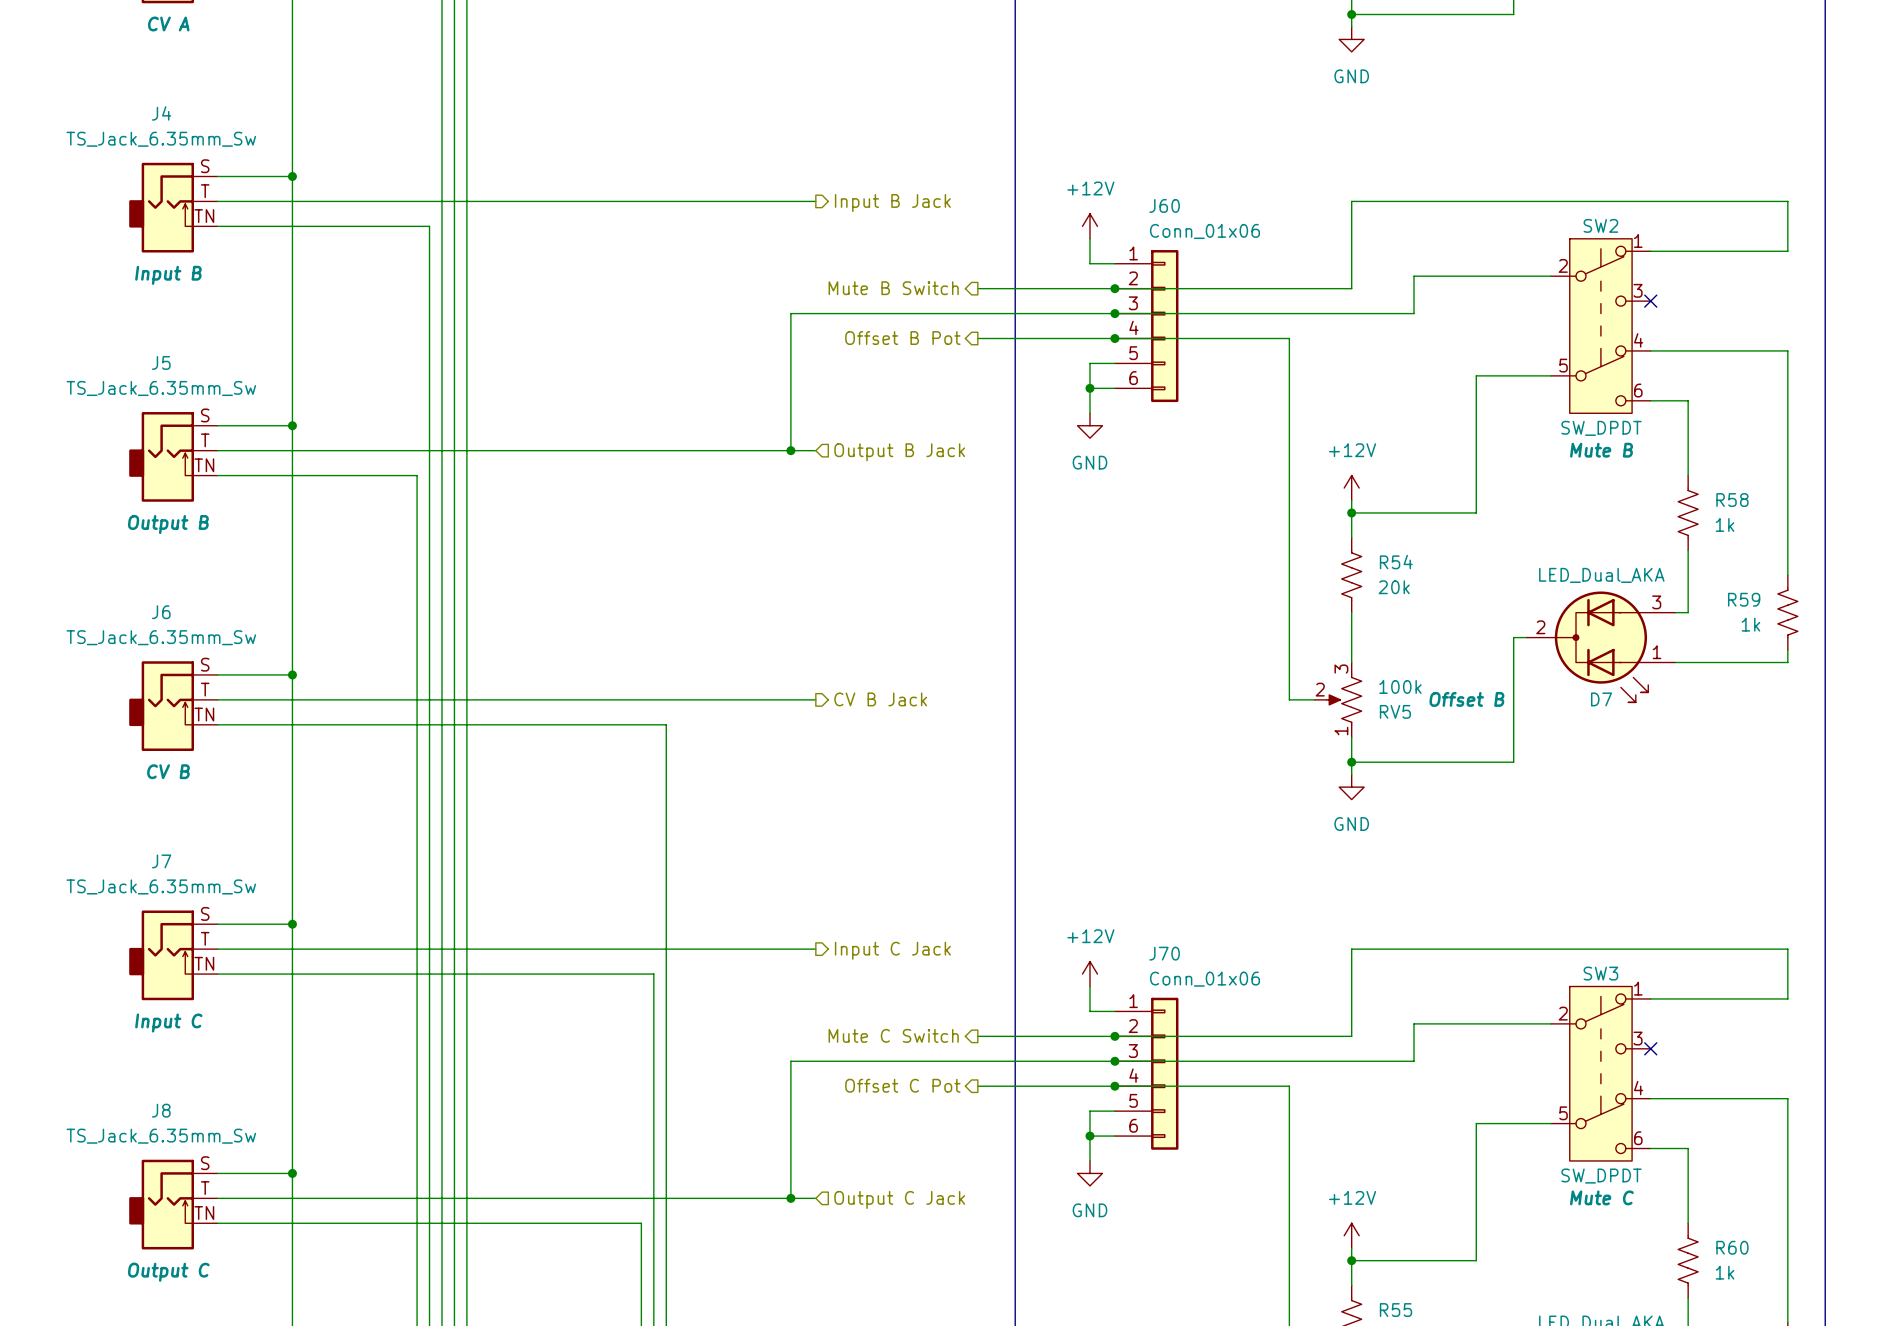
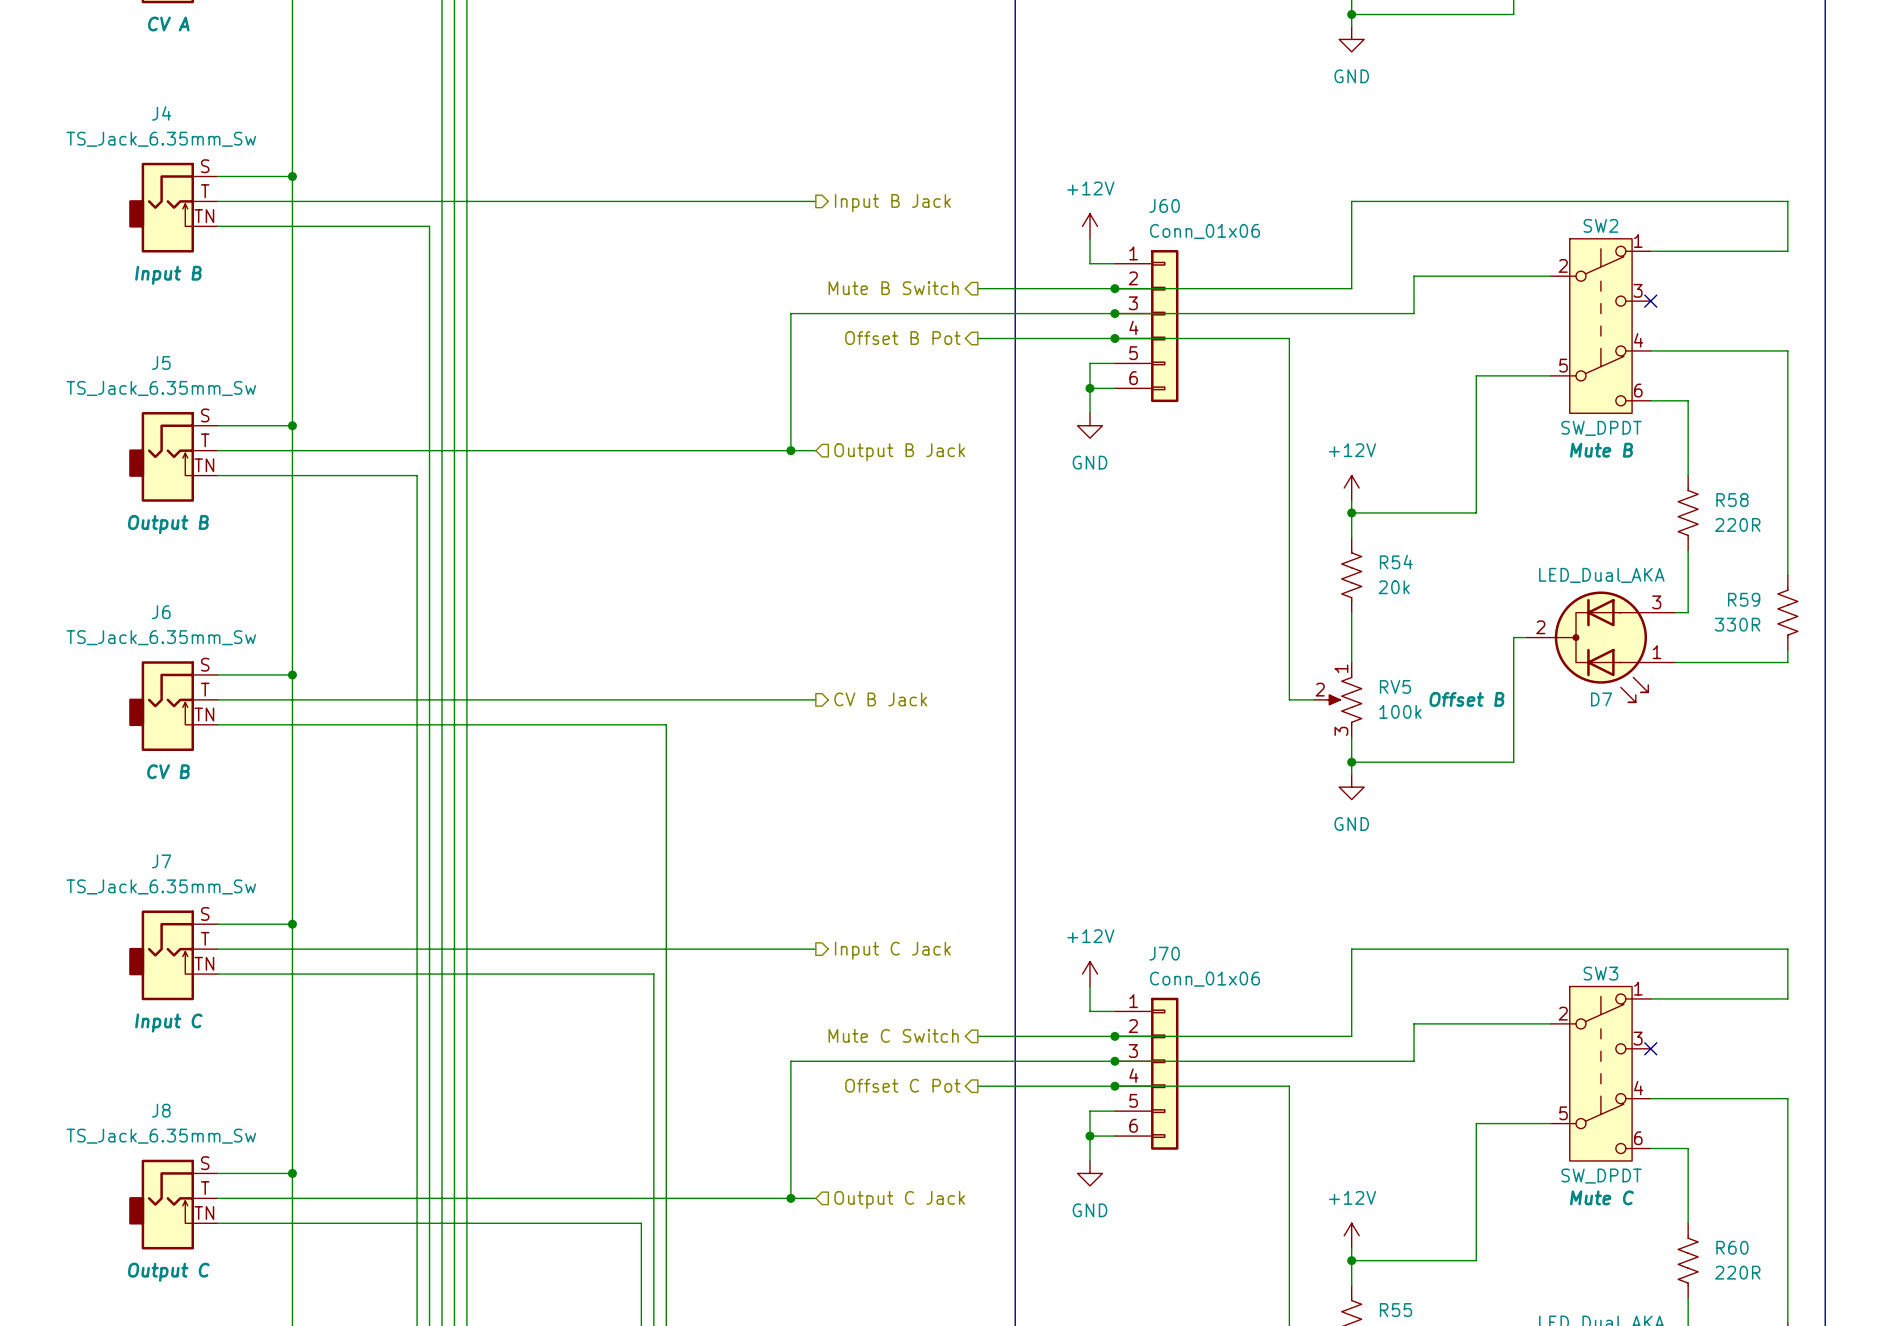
R58 value: 1k (1725, 524) -> 220R (1737, 524)
R59 value: 1k (1750, 624) -> 330R (1737, 624)
RV5 flip: as is (1344, 699) -> up-down (1344, 699)
R60 value: 1k (1725, 1272) -> 220R (1737, 1272)

